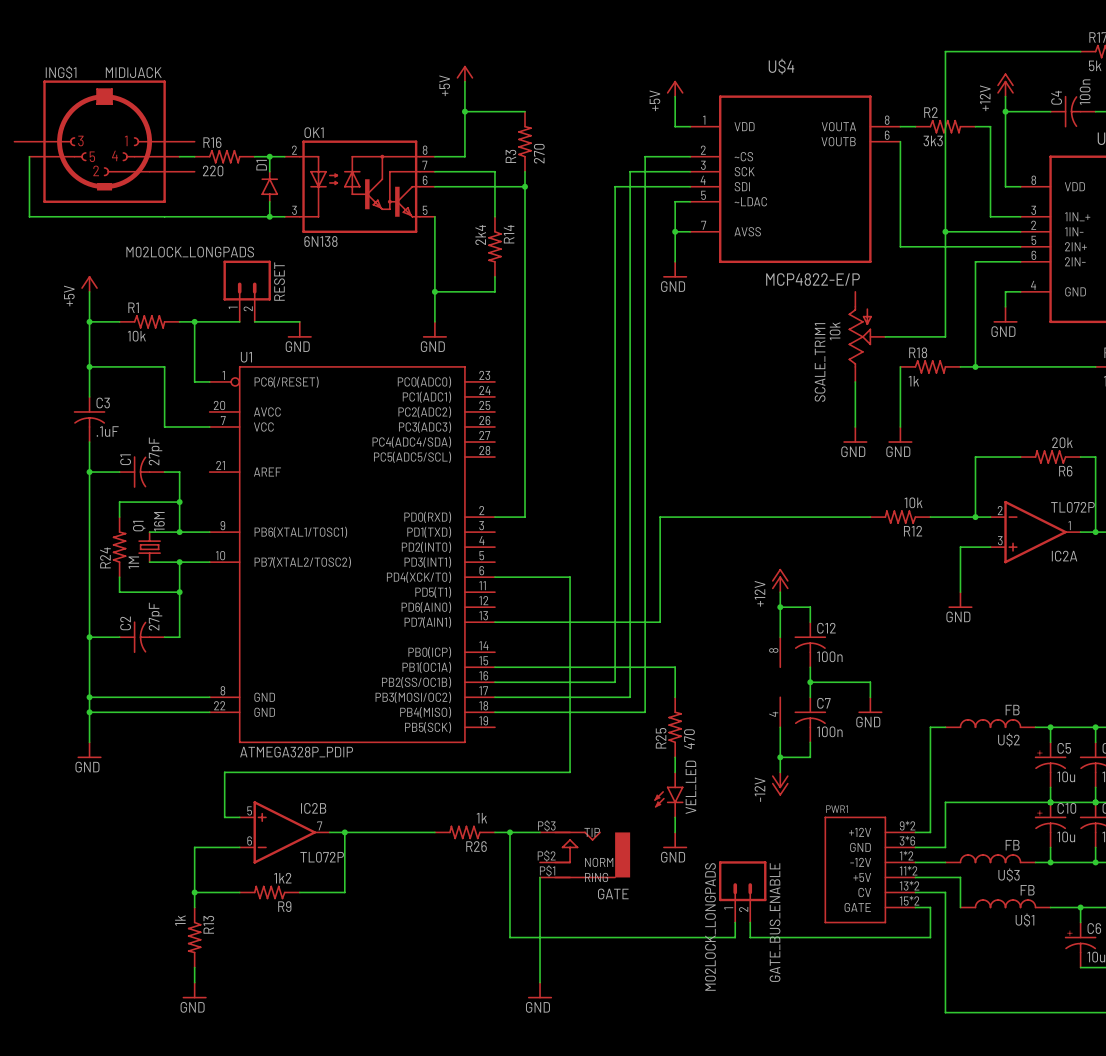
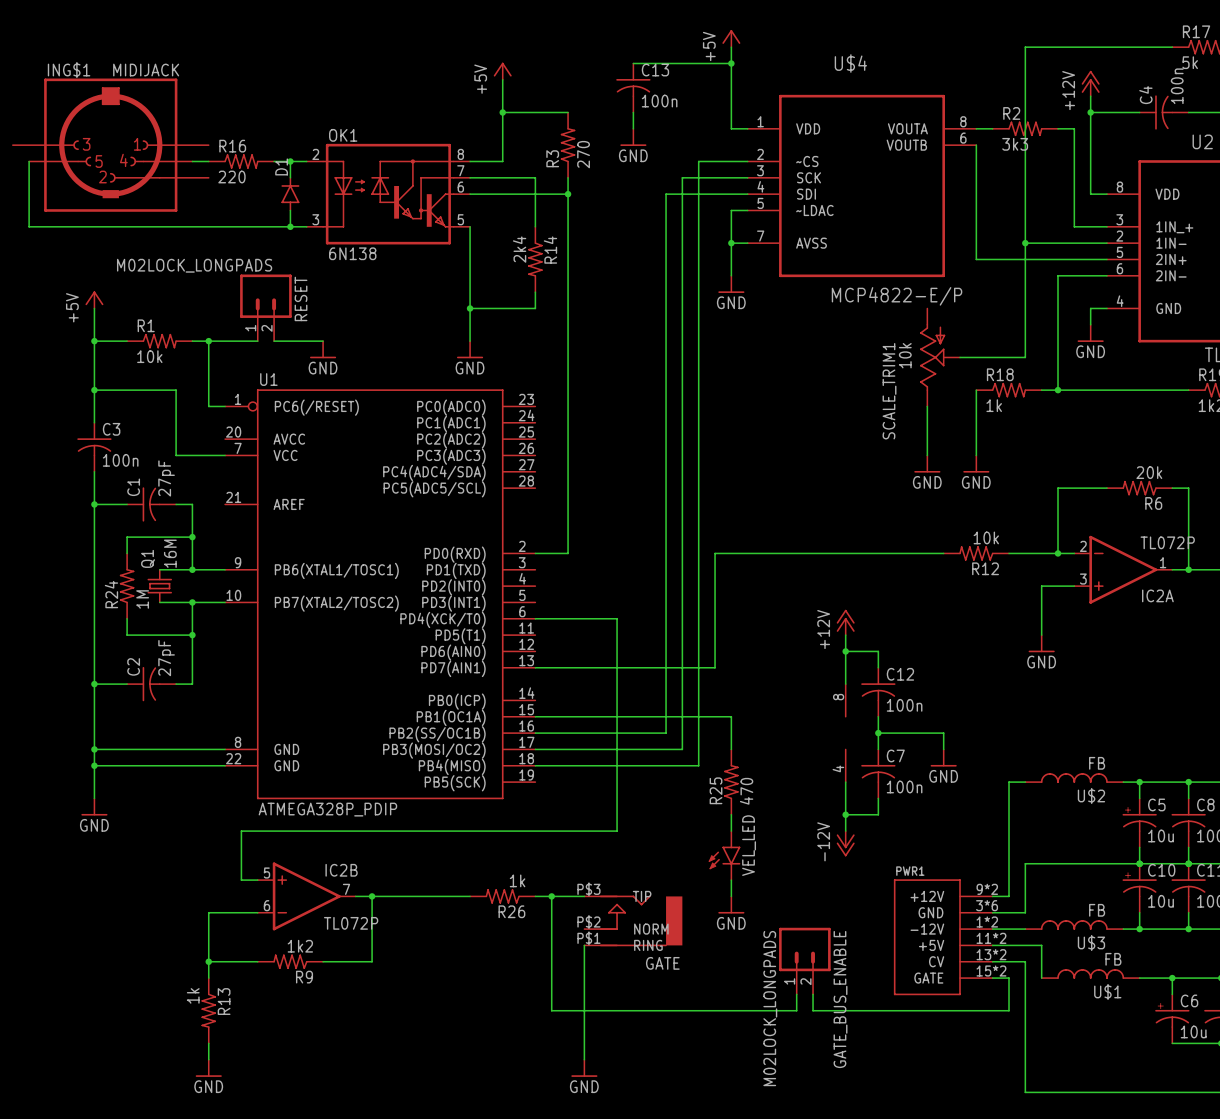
wire: none -> (731, 47) (731, 96)
wire: none -> (633, 63) (731, 63)
junction: none -> (731, 63)
power symbol position: +5V (675, 88) -> +5V (731, 38)
C13: none -> 100n (633, 88)
wire: none -> (633, 112) (633, 128)
power symbol: none -> GND (633, 137)
C3 value: .1uF (107, 431) -> 100n (120, 460)

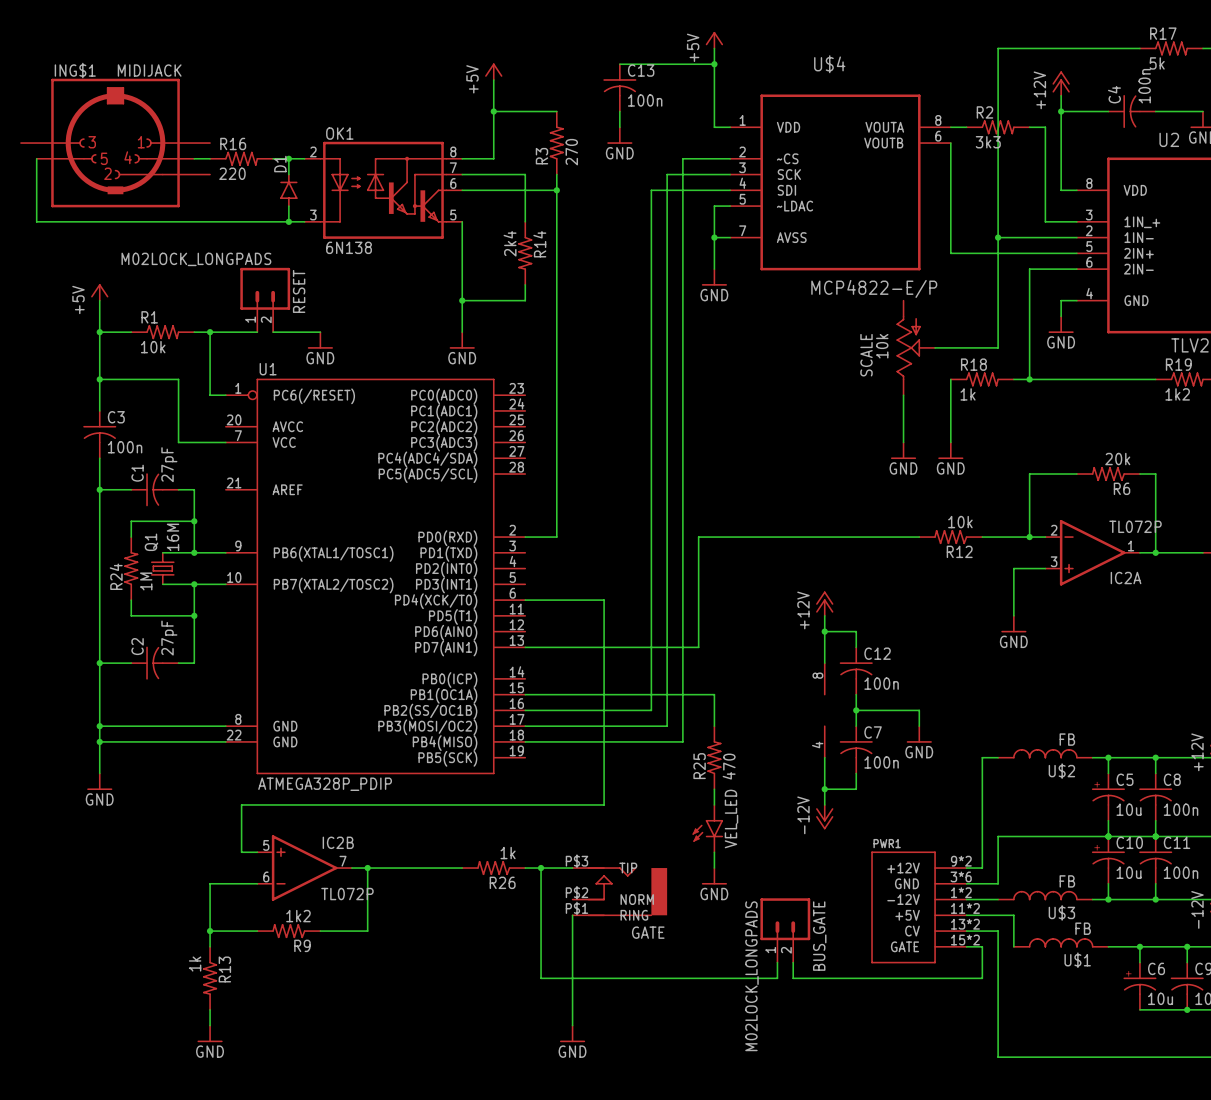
SCALE_TRIM1 name: SCALE_TRIM1 (889, 391) -> SCALE (866, 355)
GATE_BUS_ENABLE name: GATE_BUS_ENABLE (840, 999) -> BUS_GATE (819, 936)

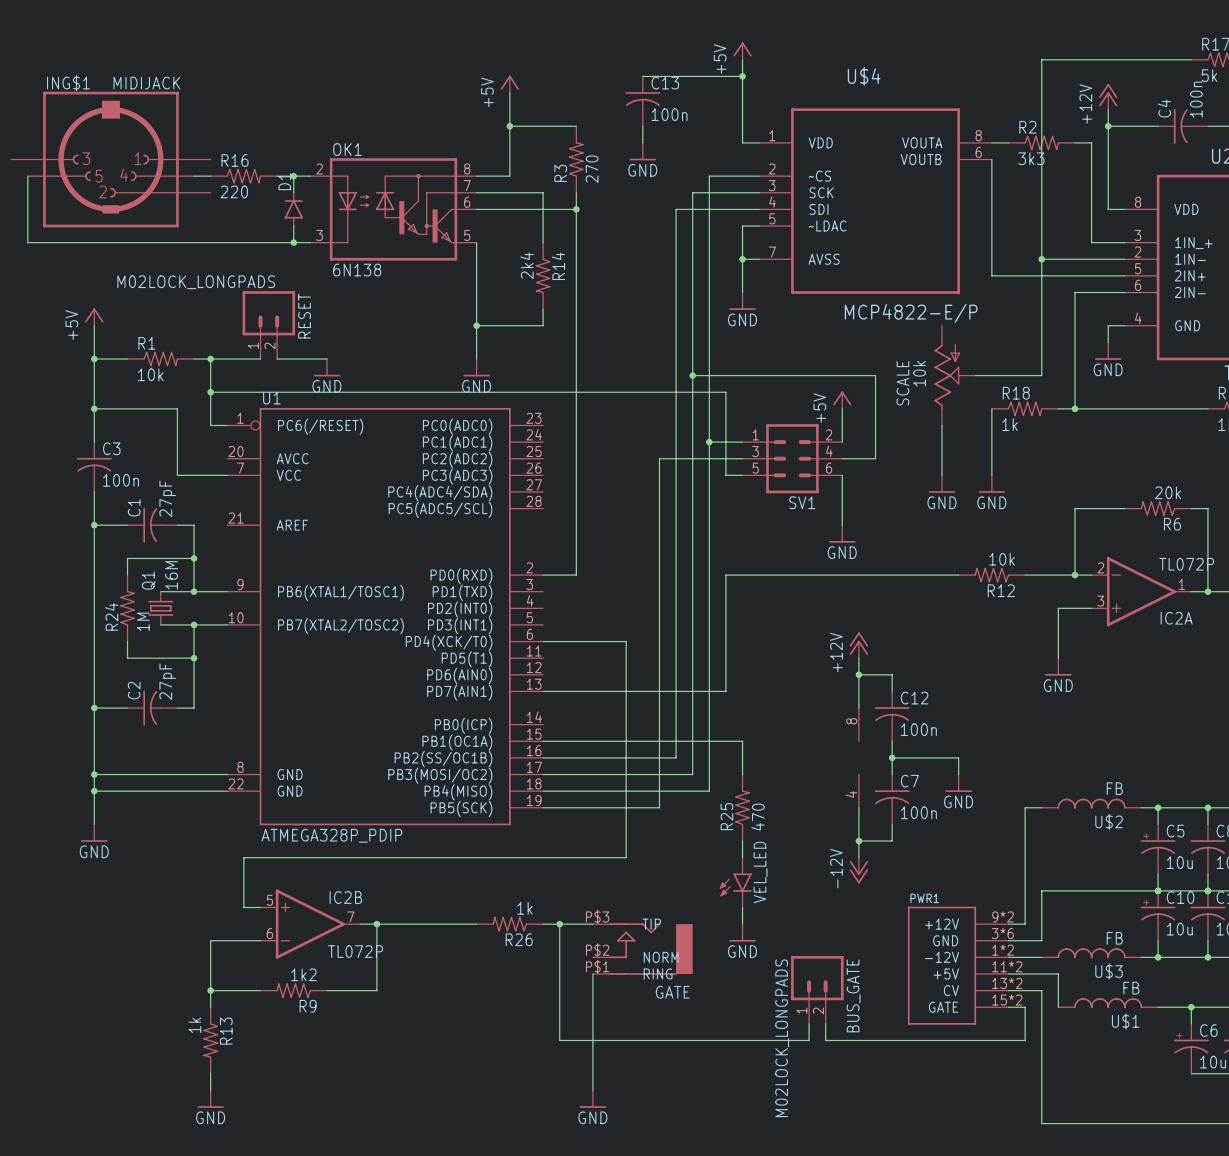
wire: none -> (692, 375) (875, 375) (875, 458) (842, 458)
junction: none -> (692, 375)
wire: none -> (210, 392) (725, 392) (725, 475) (742, 475)
junction: none -> (210, 392)
power symbol: none -> +5V (842, 400)
wire: none -> (842, 408) (842, 442)
wire: none -> (709, 442) (742, 442)
junction: none -> (709, 442)
wire: none -> (742, 458) (659, 458) (659, 807) (543, 807)
SV1: none -> (792, 458)
wire: none -> (842, 475) (842, 525)
power symbol: none -> GND (842, 533)

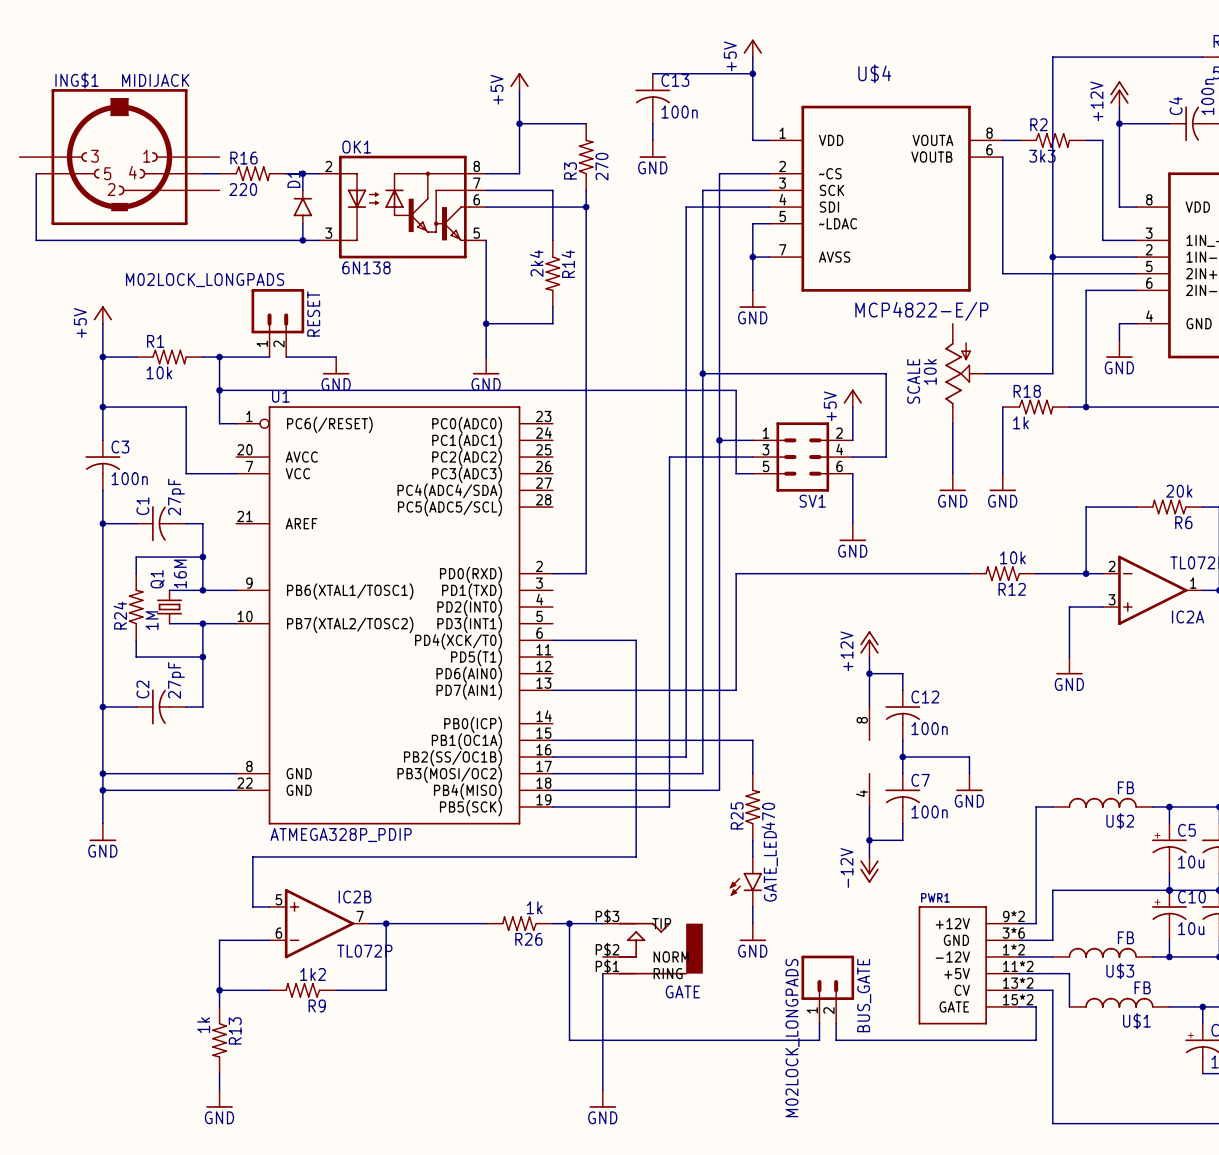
VEL_LED: (735, 882) -> none
GATE_LED: none -> (745, 881)

